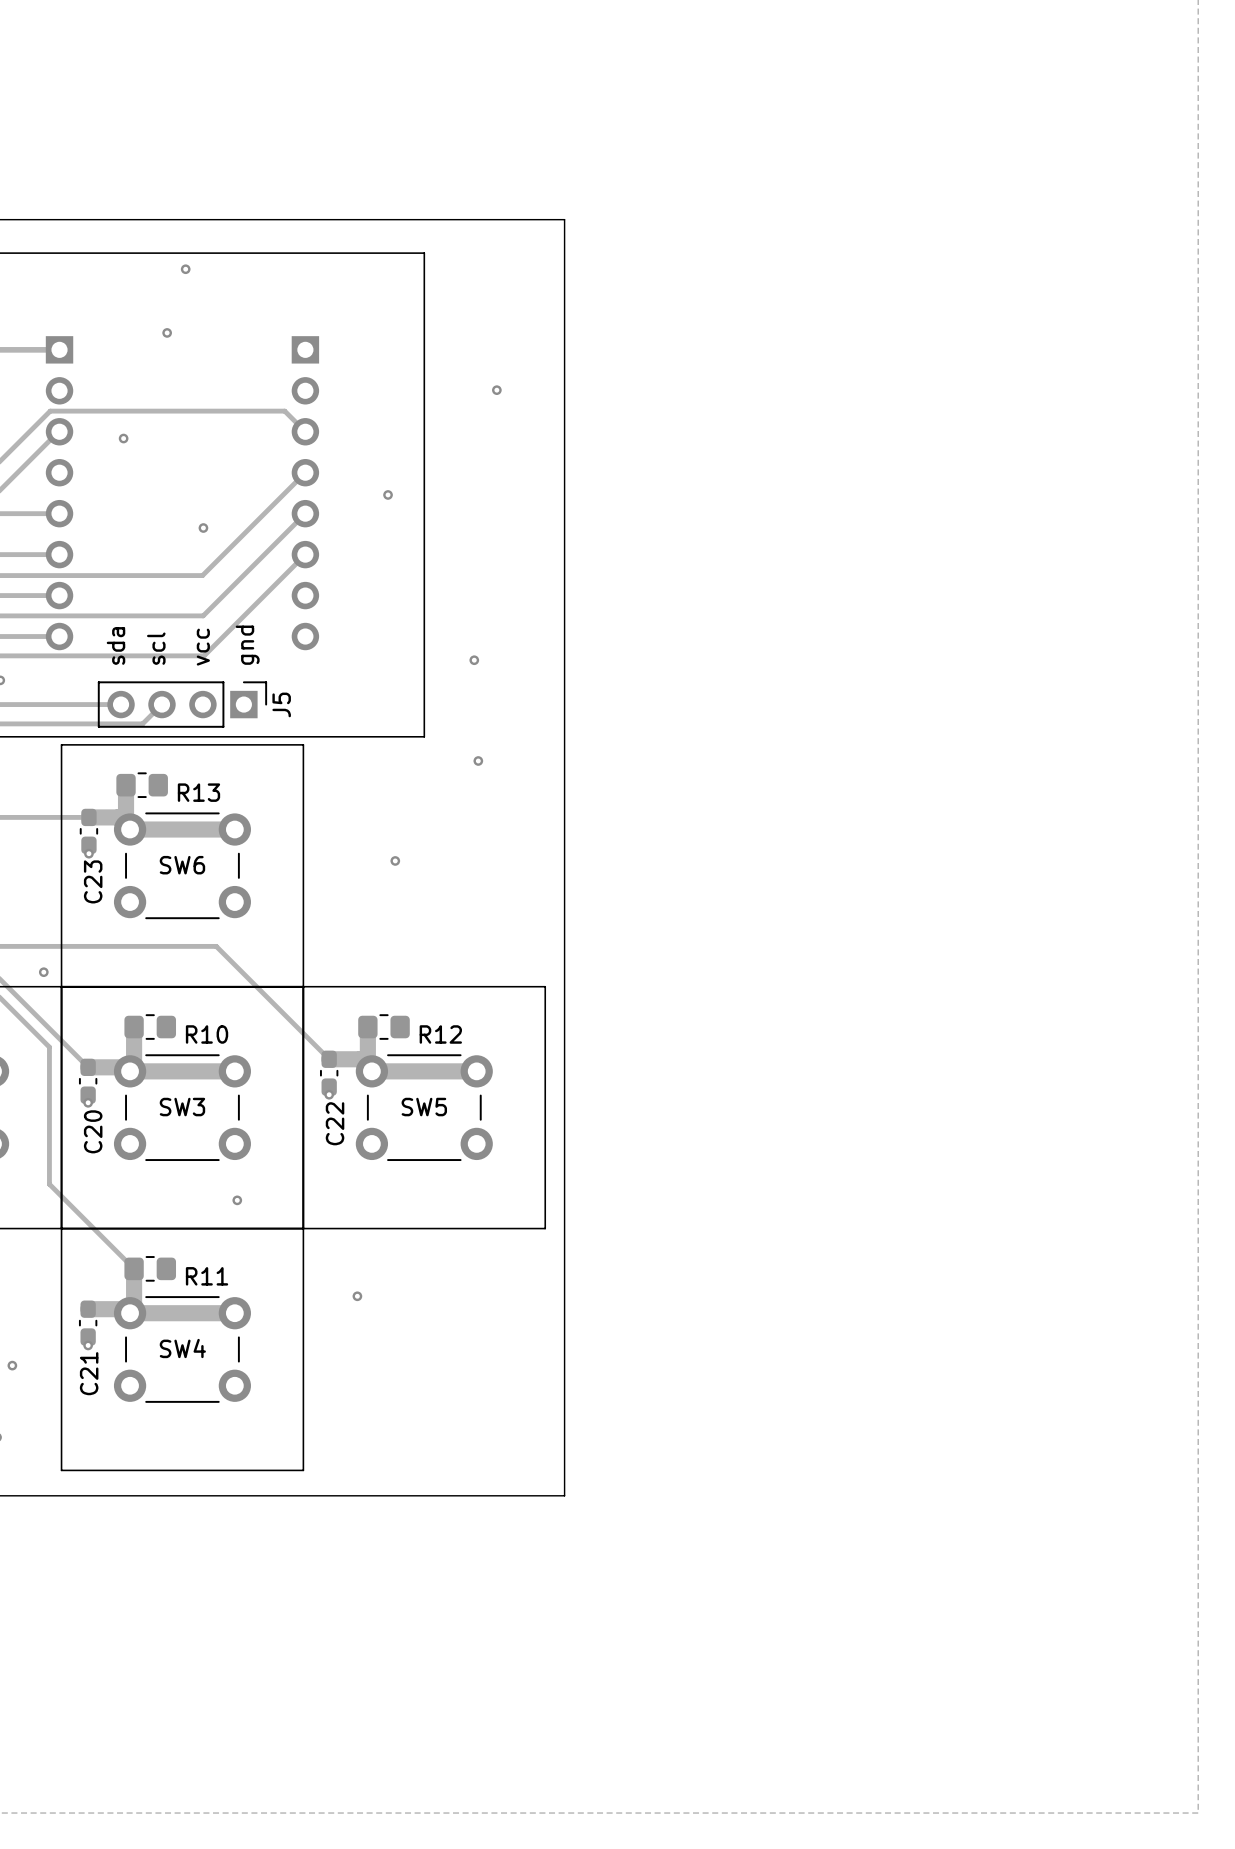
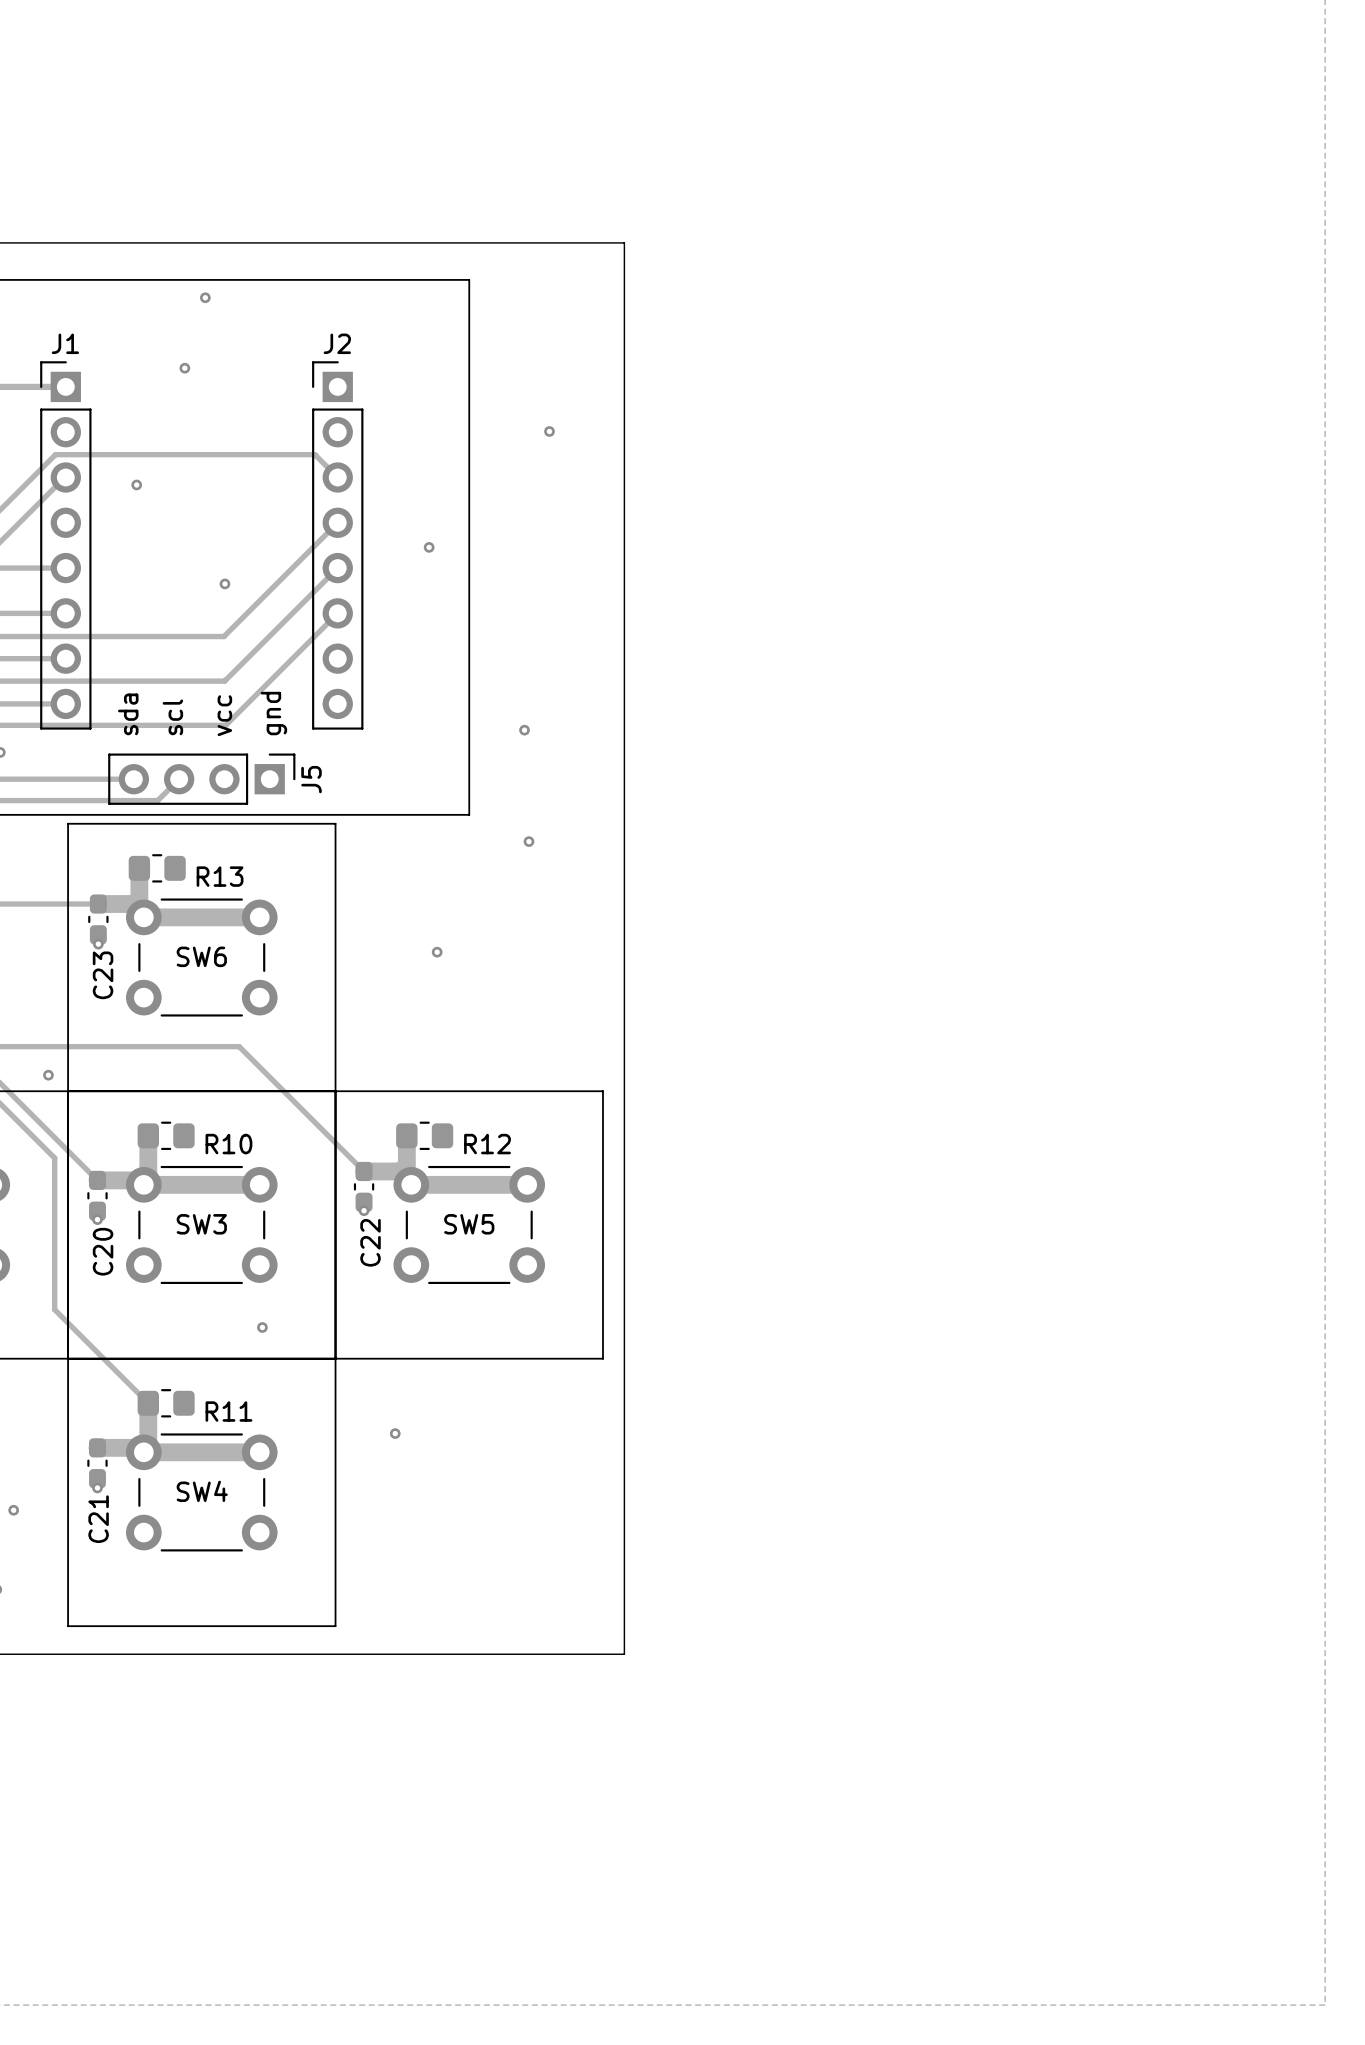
J1 side: bottom (59, 493) -> top (65, 545)
J2 side: bottom (305, 493) -> top (337, 545)

